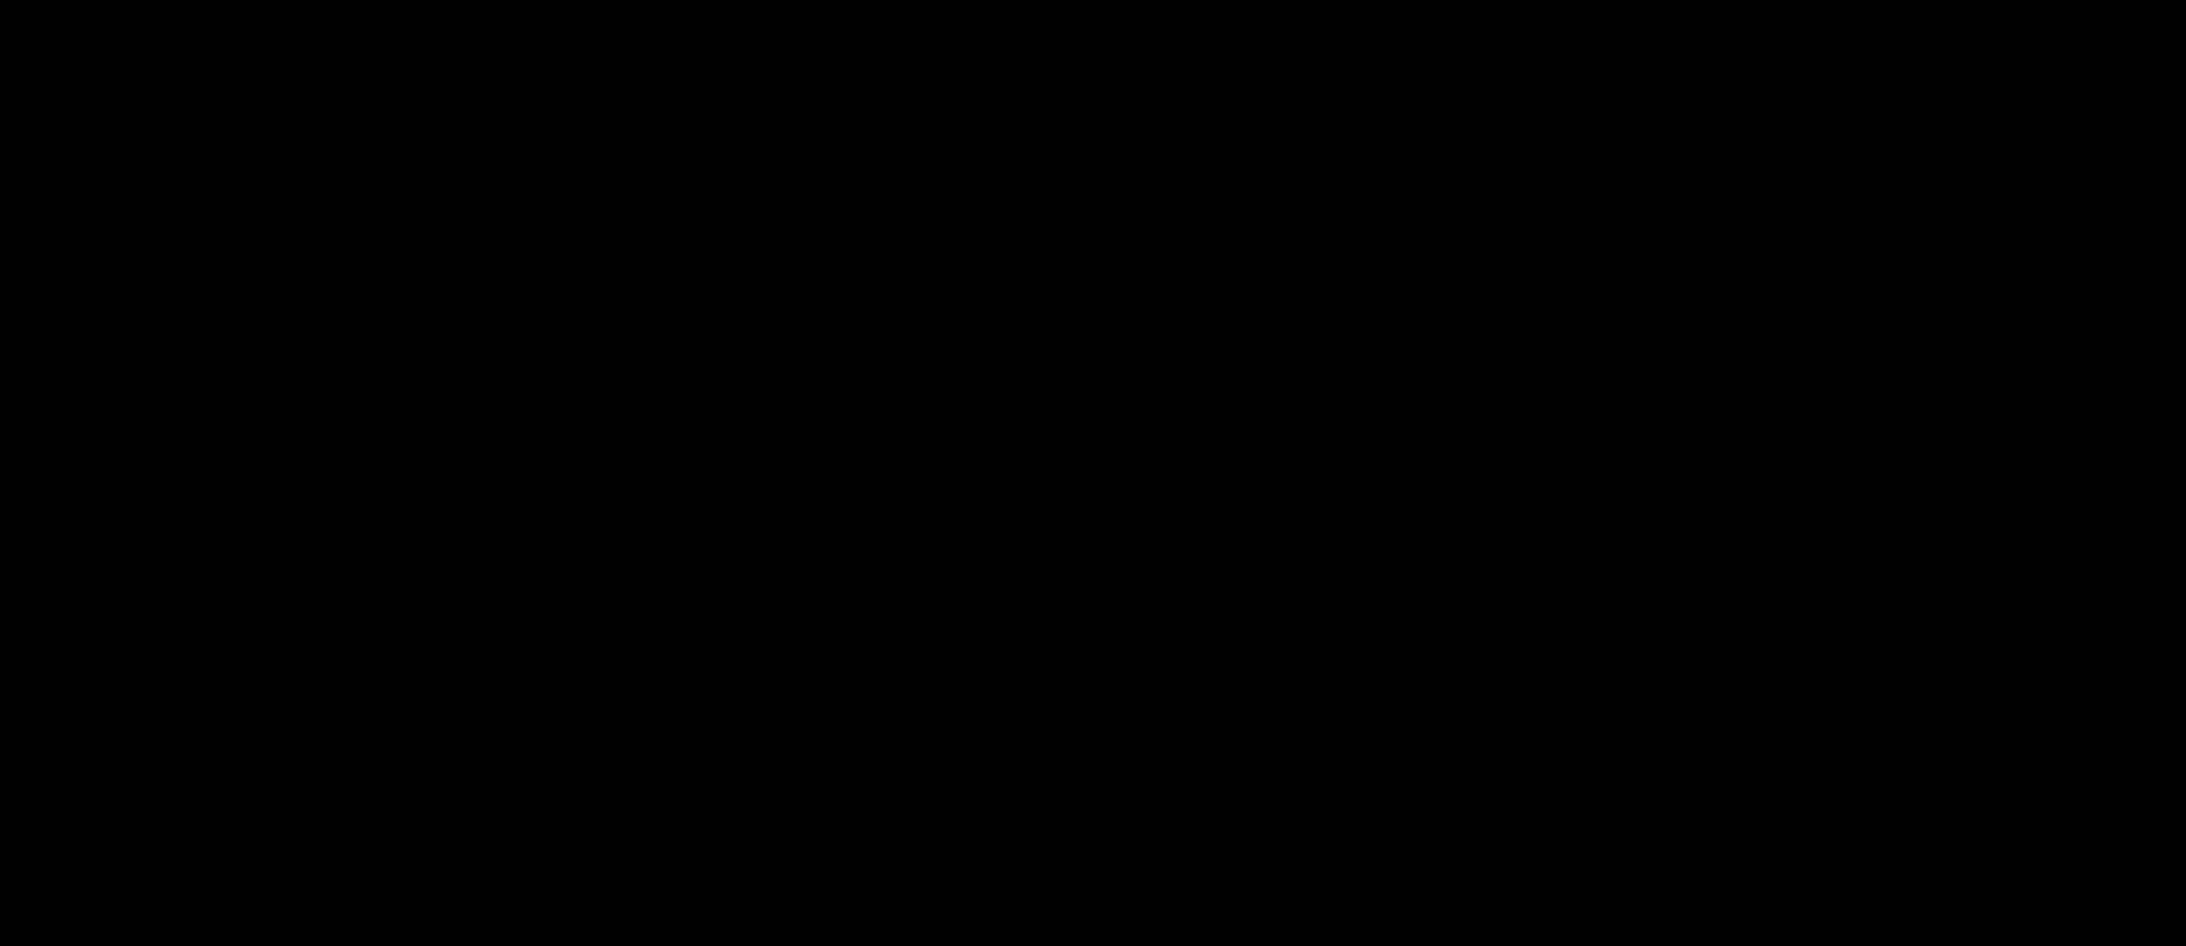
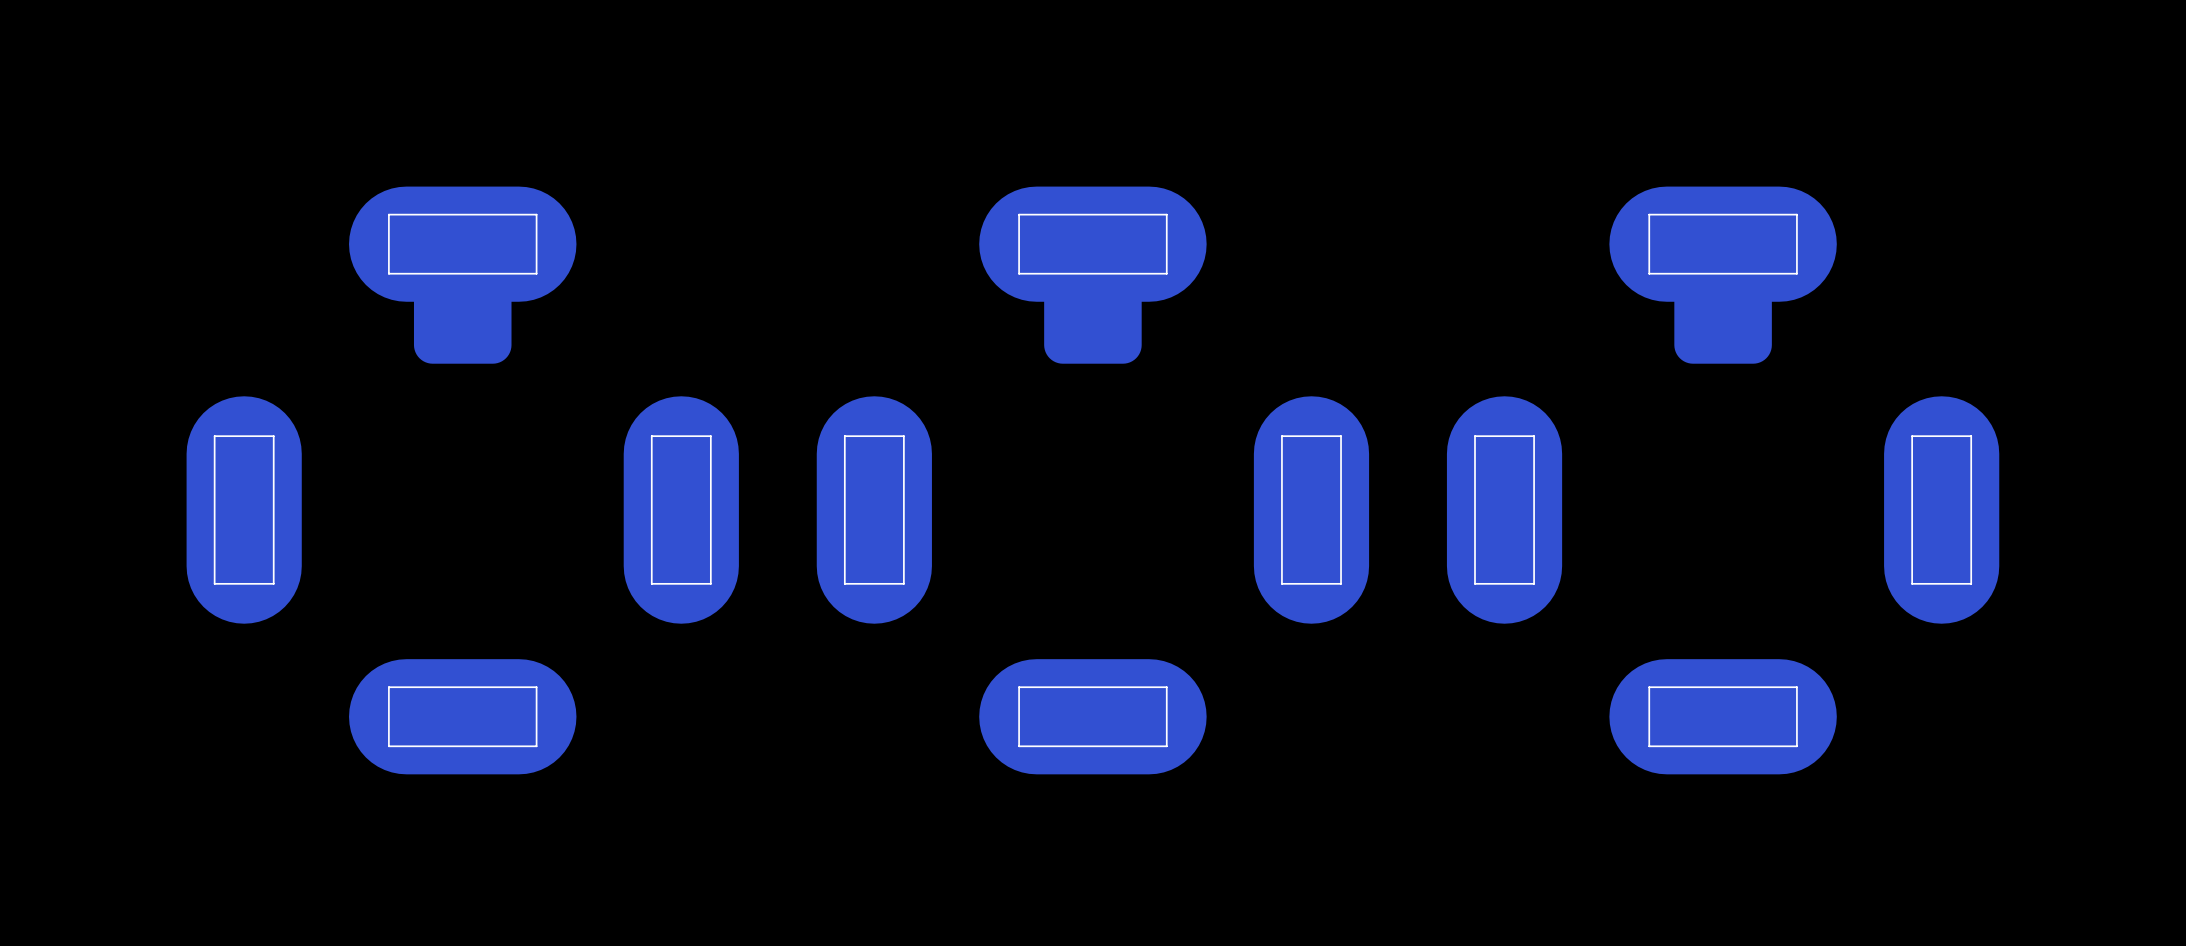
part: none -> (462, 480)
part: none -> (1092, 480)
part: none -> (1723, 480)

